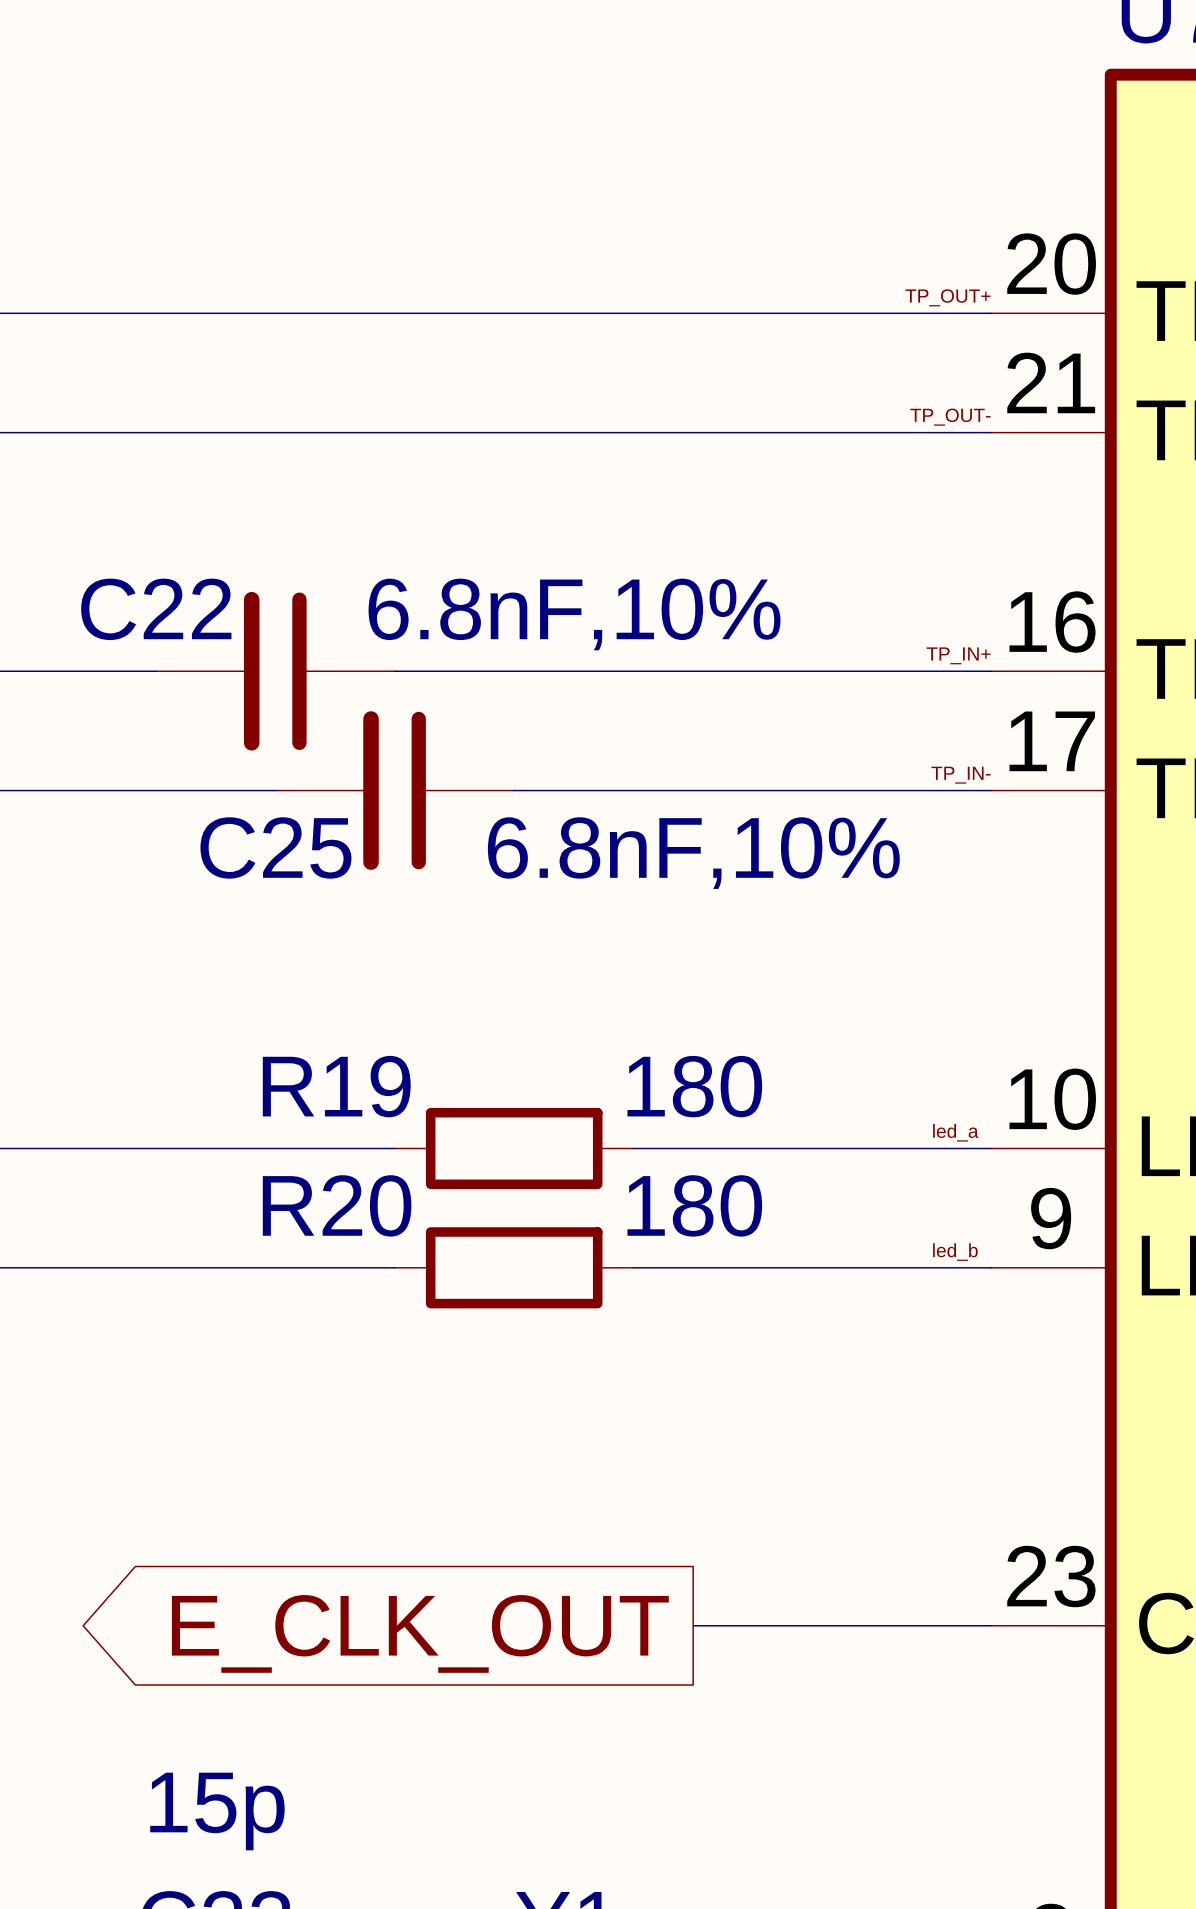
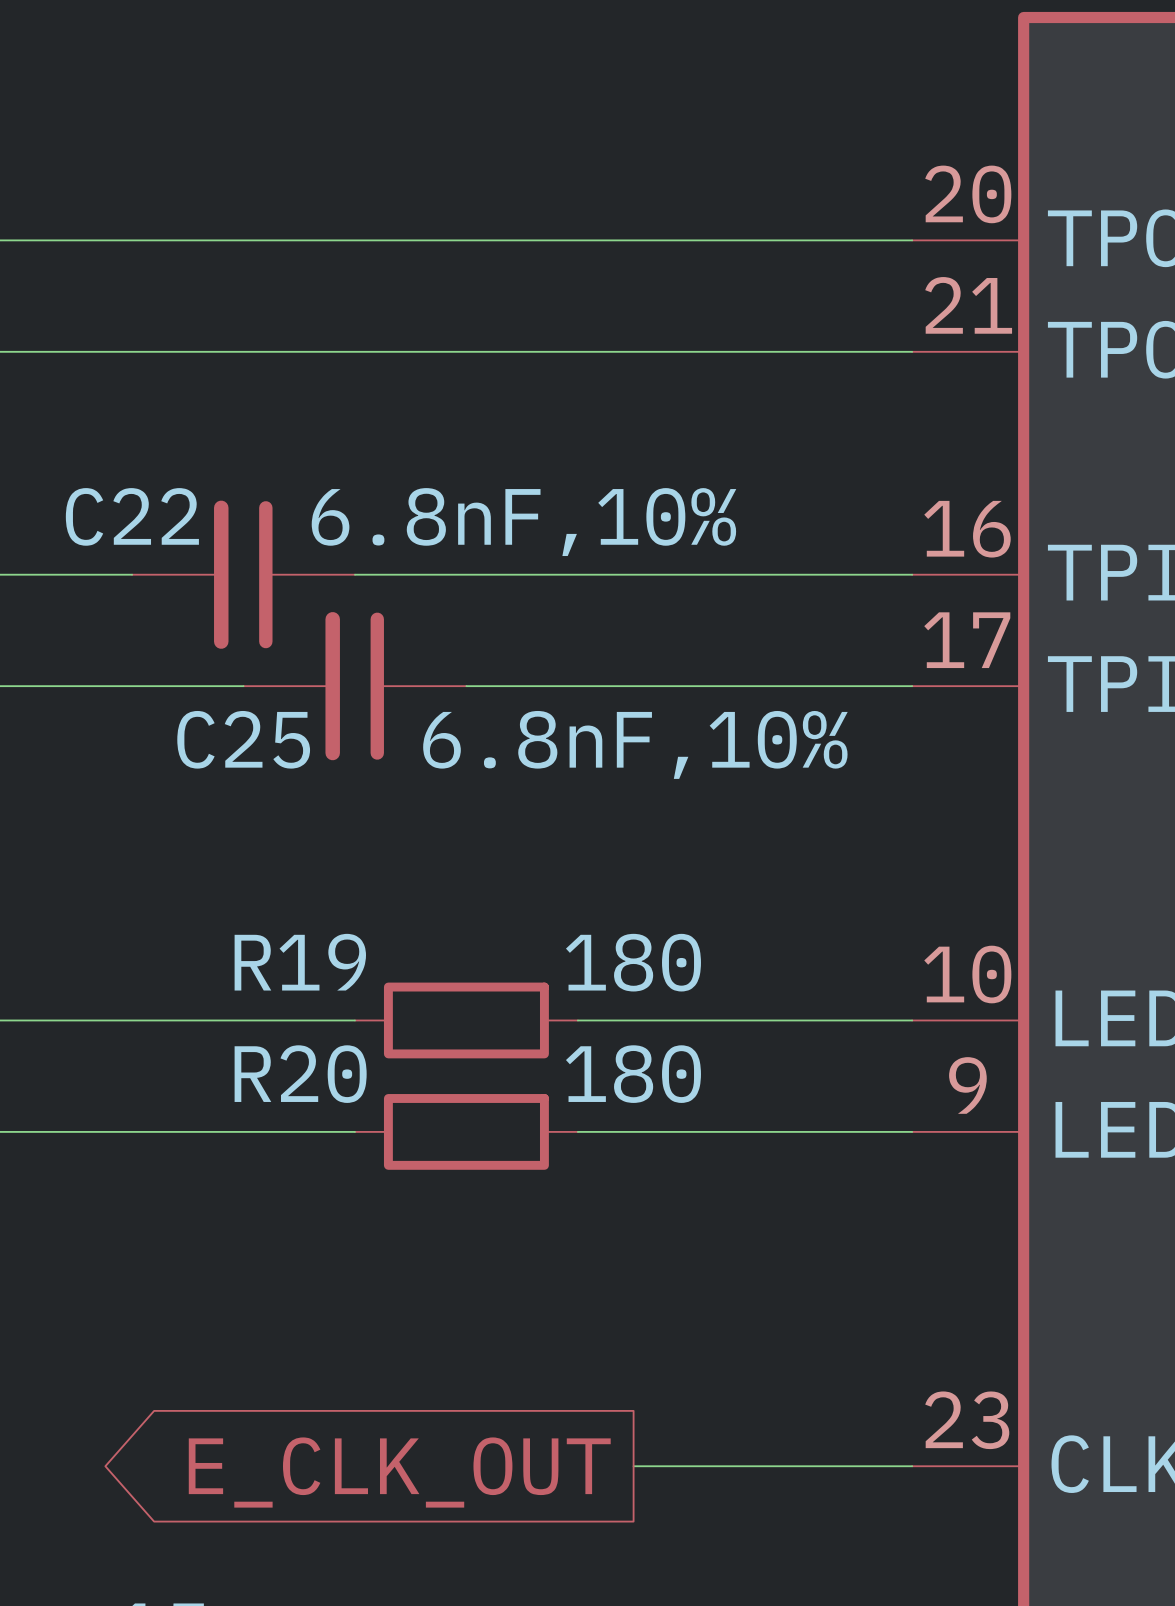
label: TP_OUT+ (948, 297) -> none
label: TP_OUT- (950, 417) -> none
label: TP_IN+ (958, 655) -> none
label: TP_IN- (961, 775) -> none
label: led_a (955, 1132) -> none
label: led_b (955, 1252) -> none

